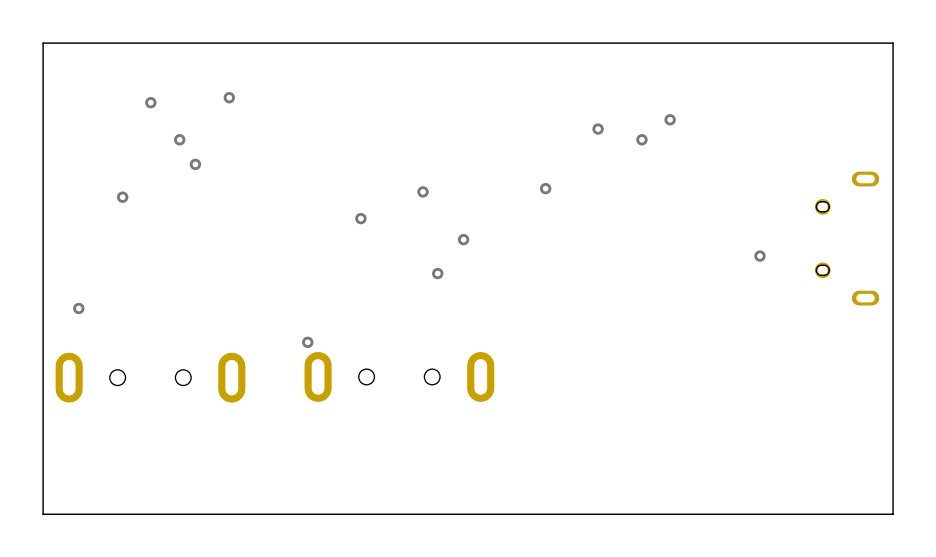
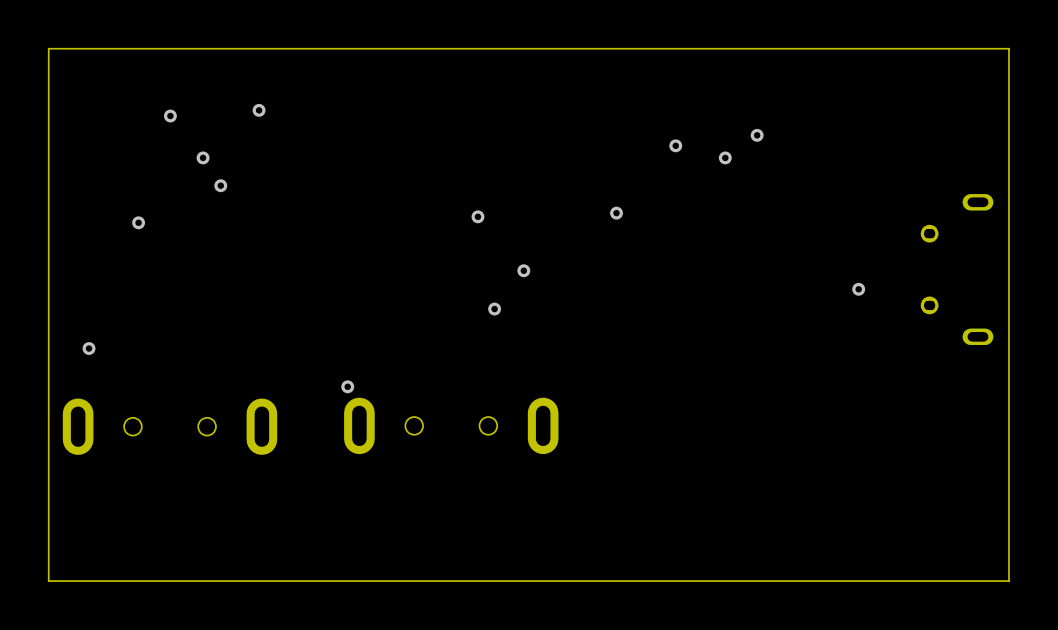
via: (360, 218) -> none

